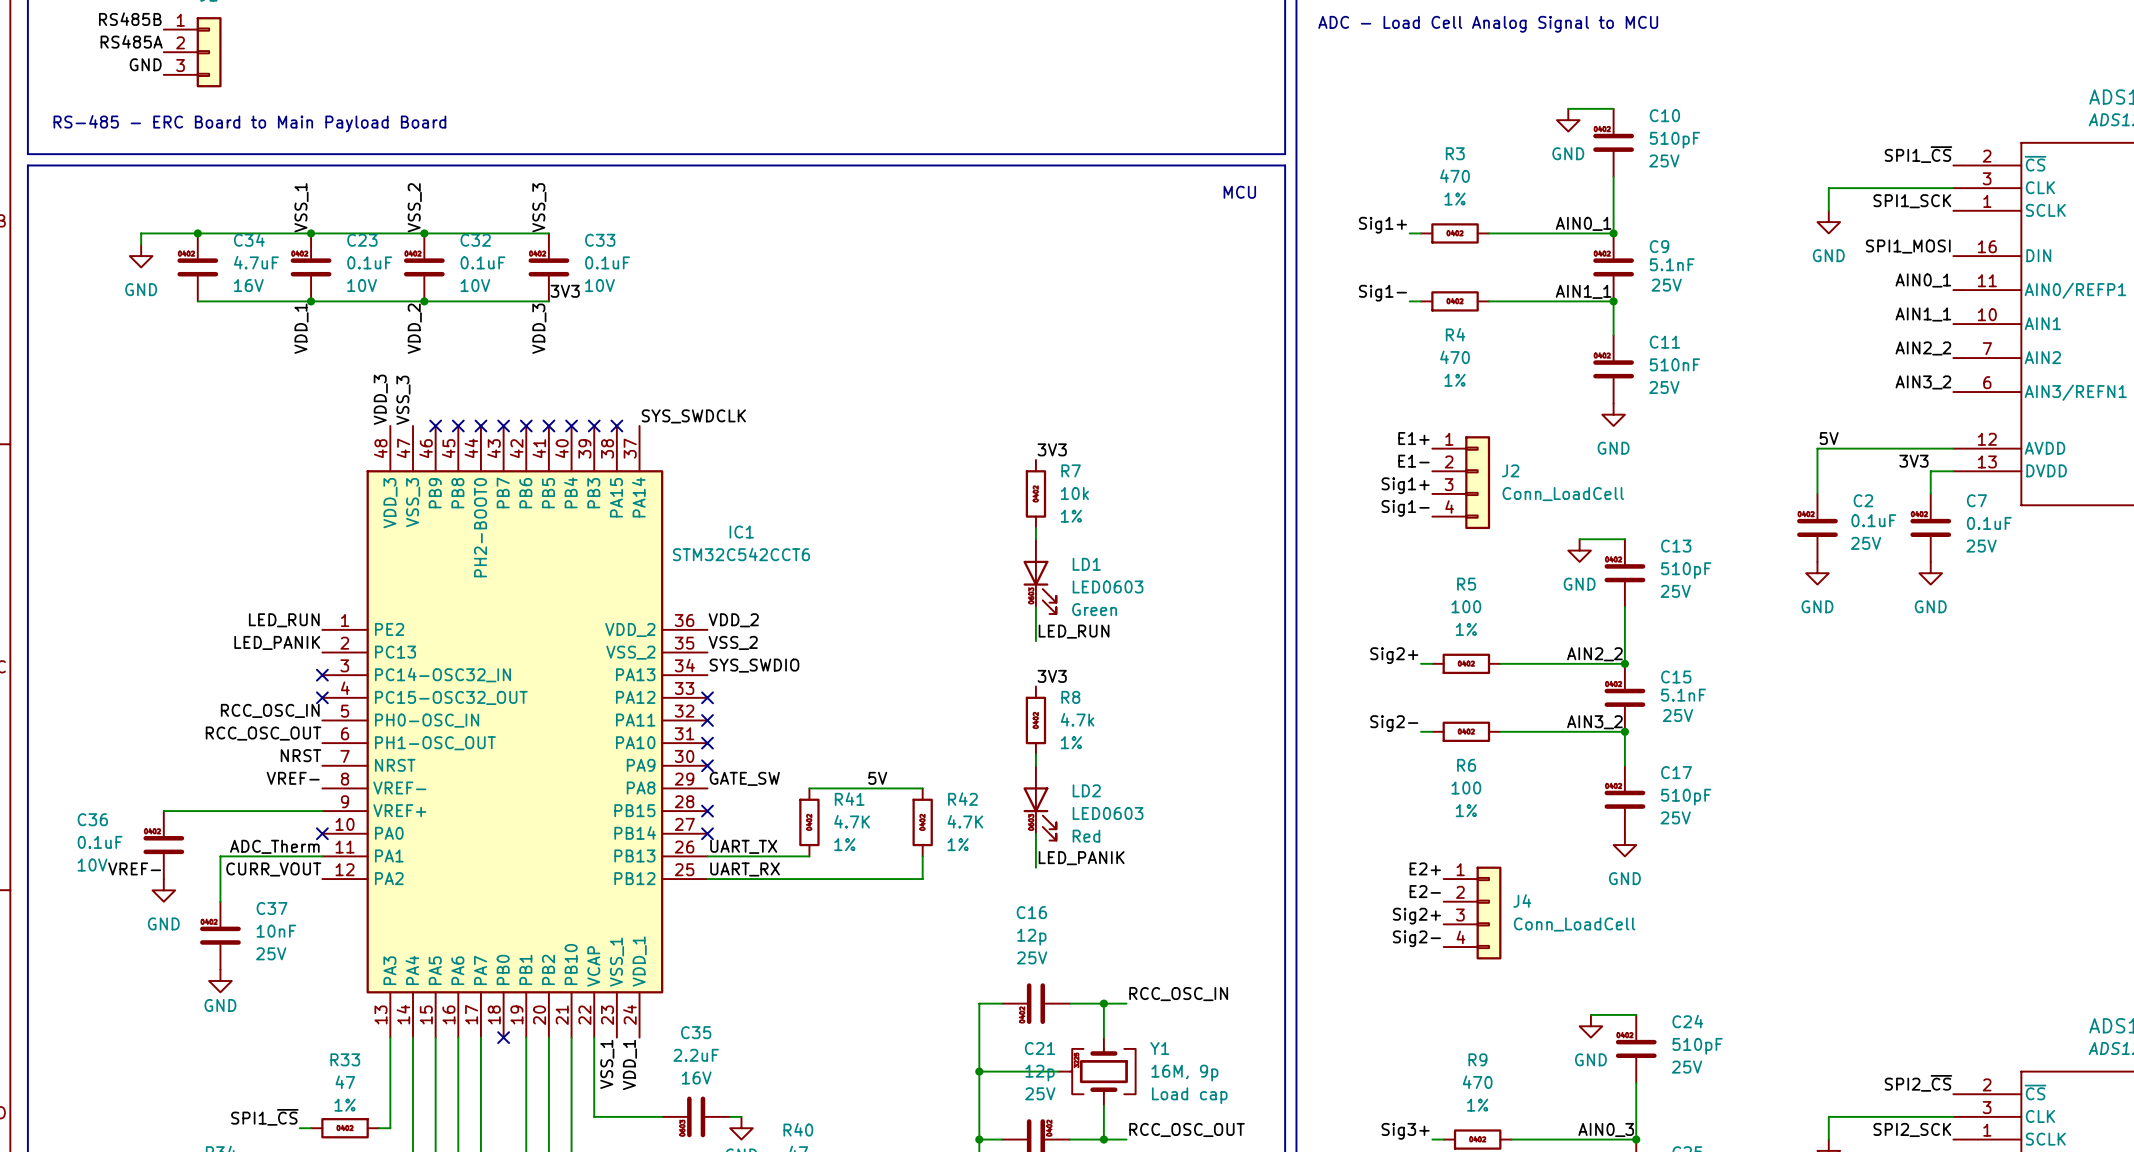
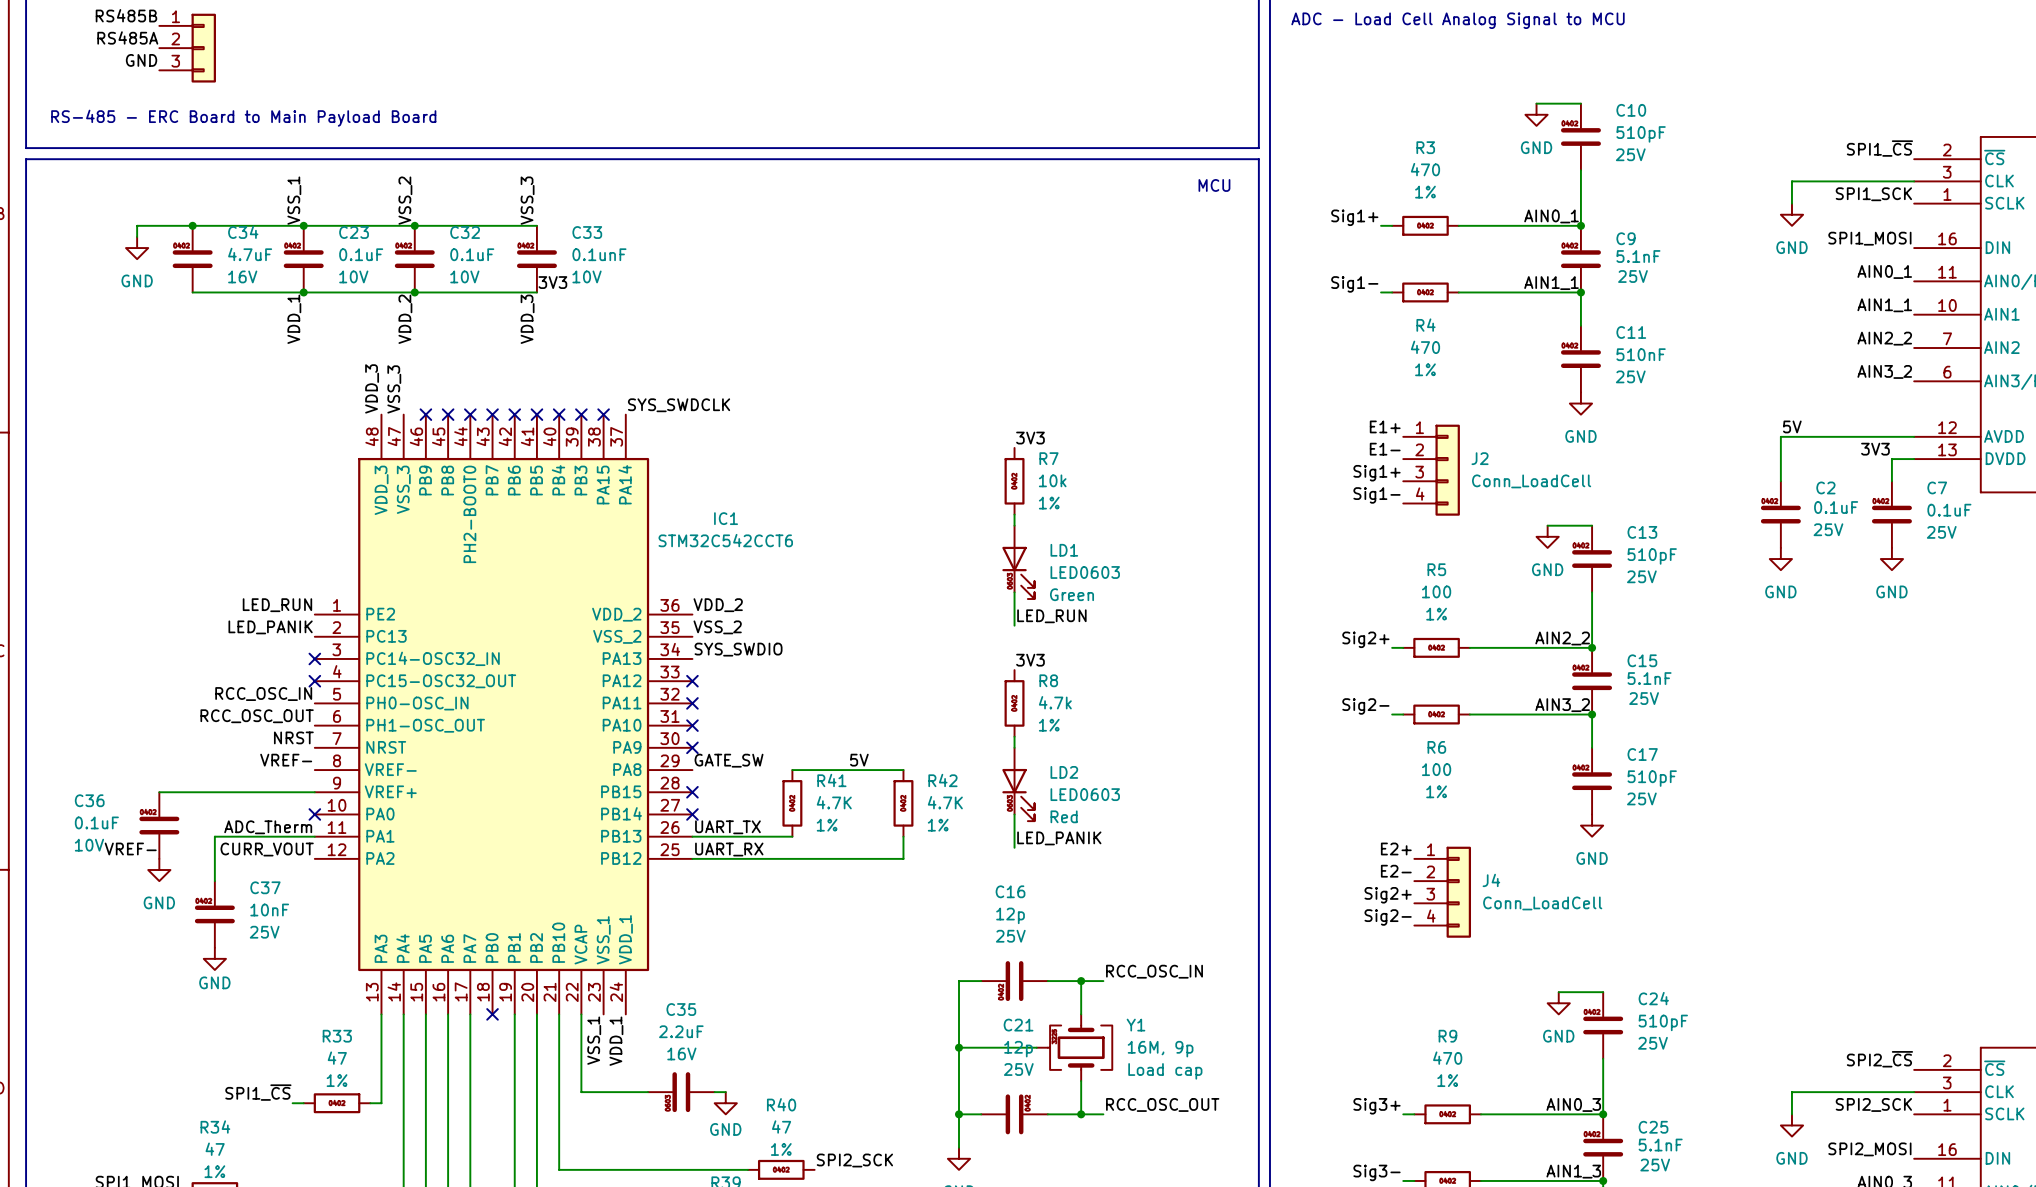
C33 value: 0.1uF (607, 262) -> 0.1unF (599, 254)

